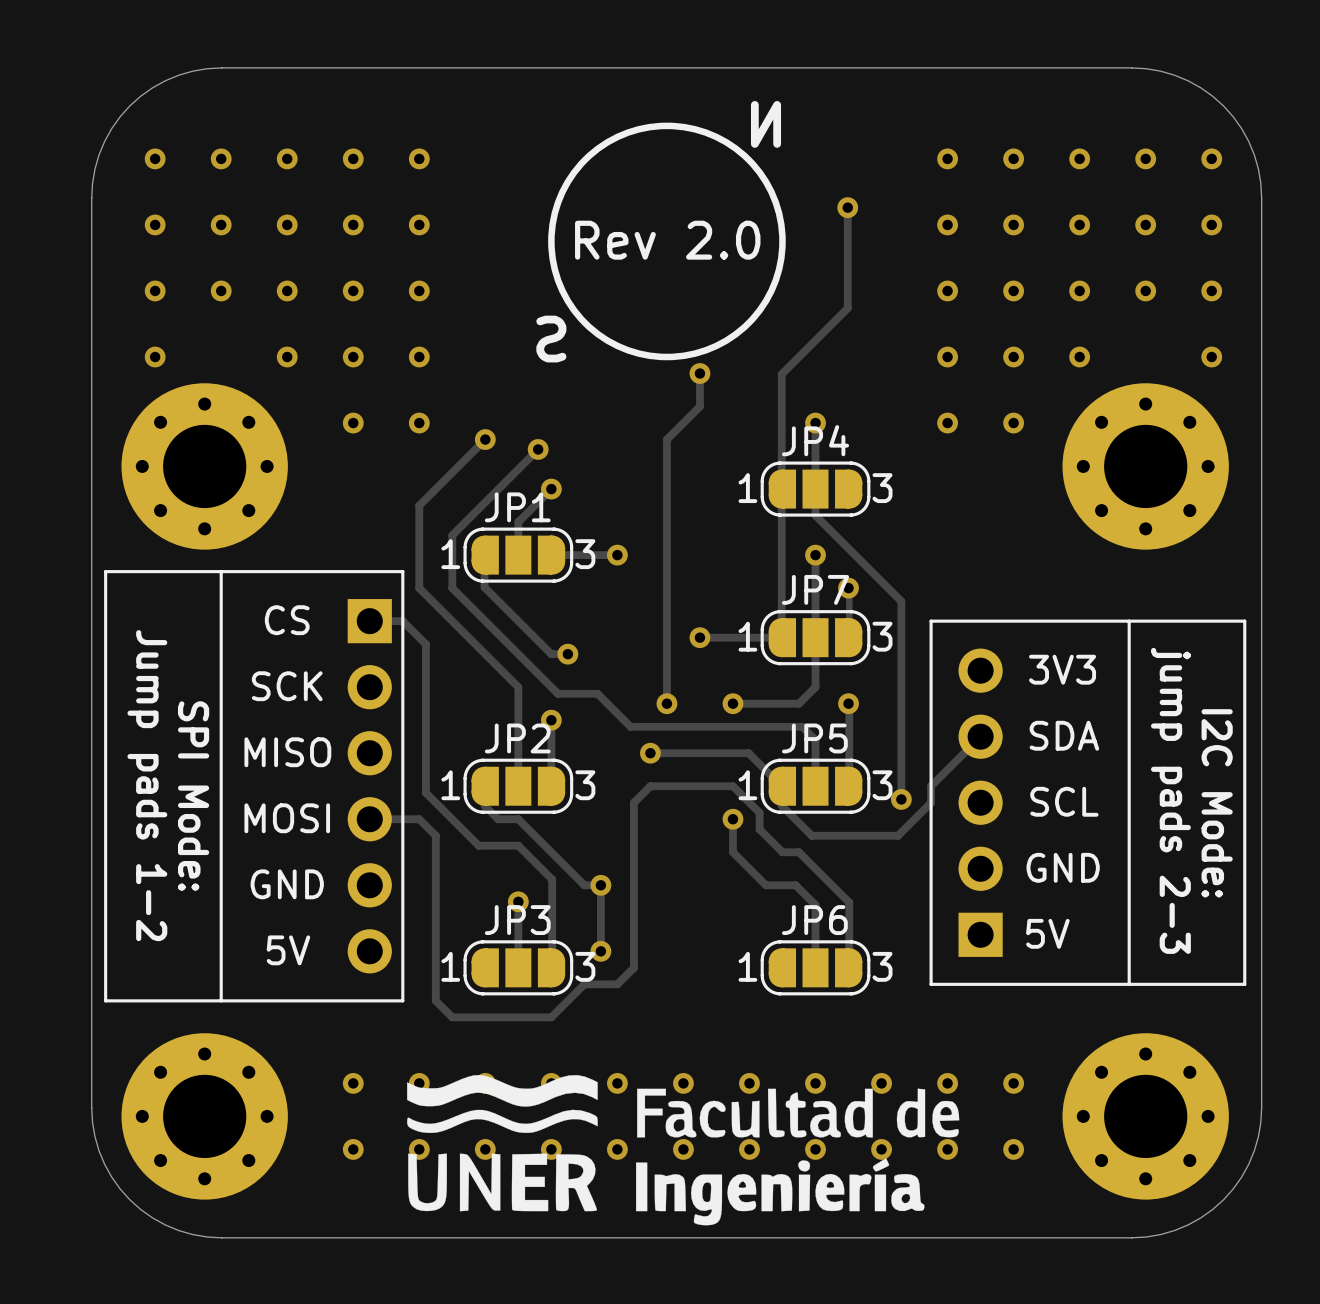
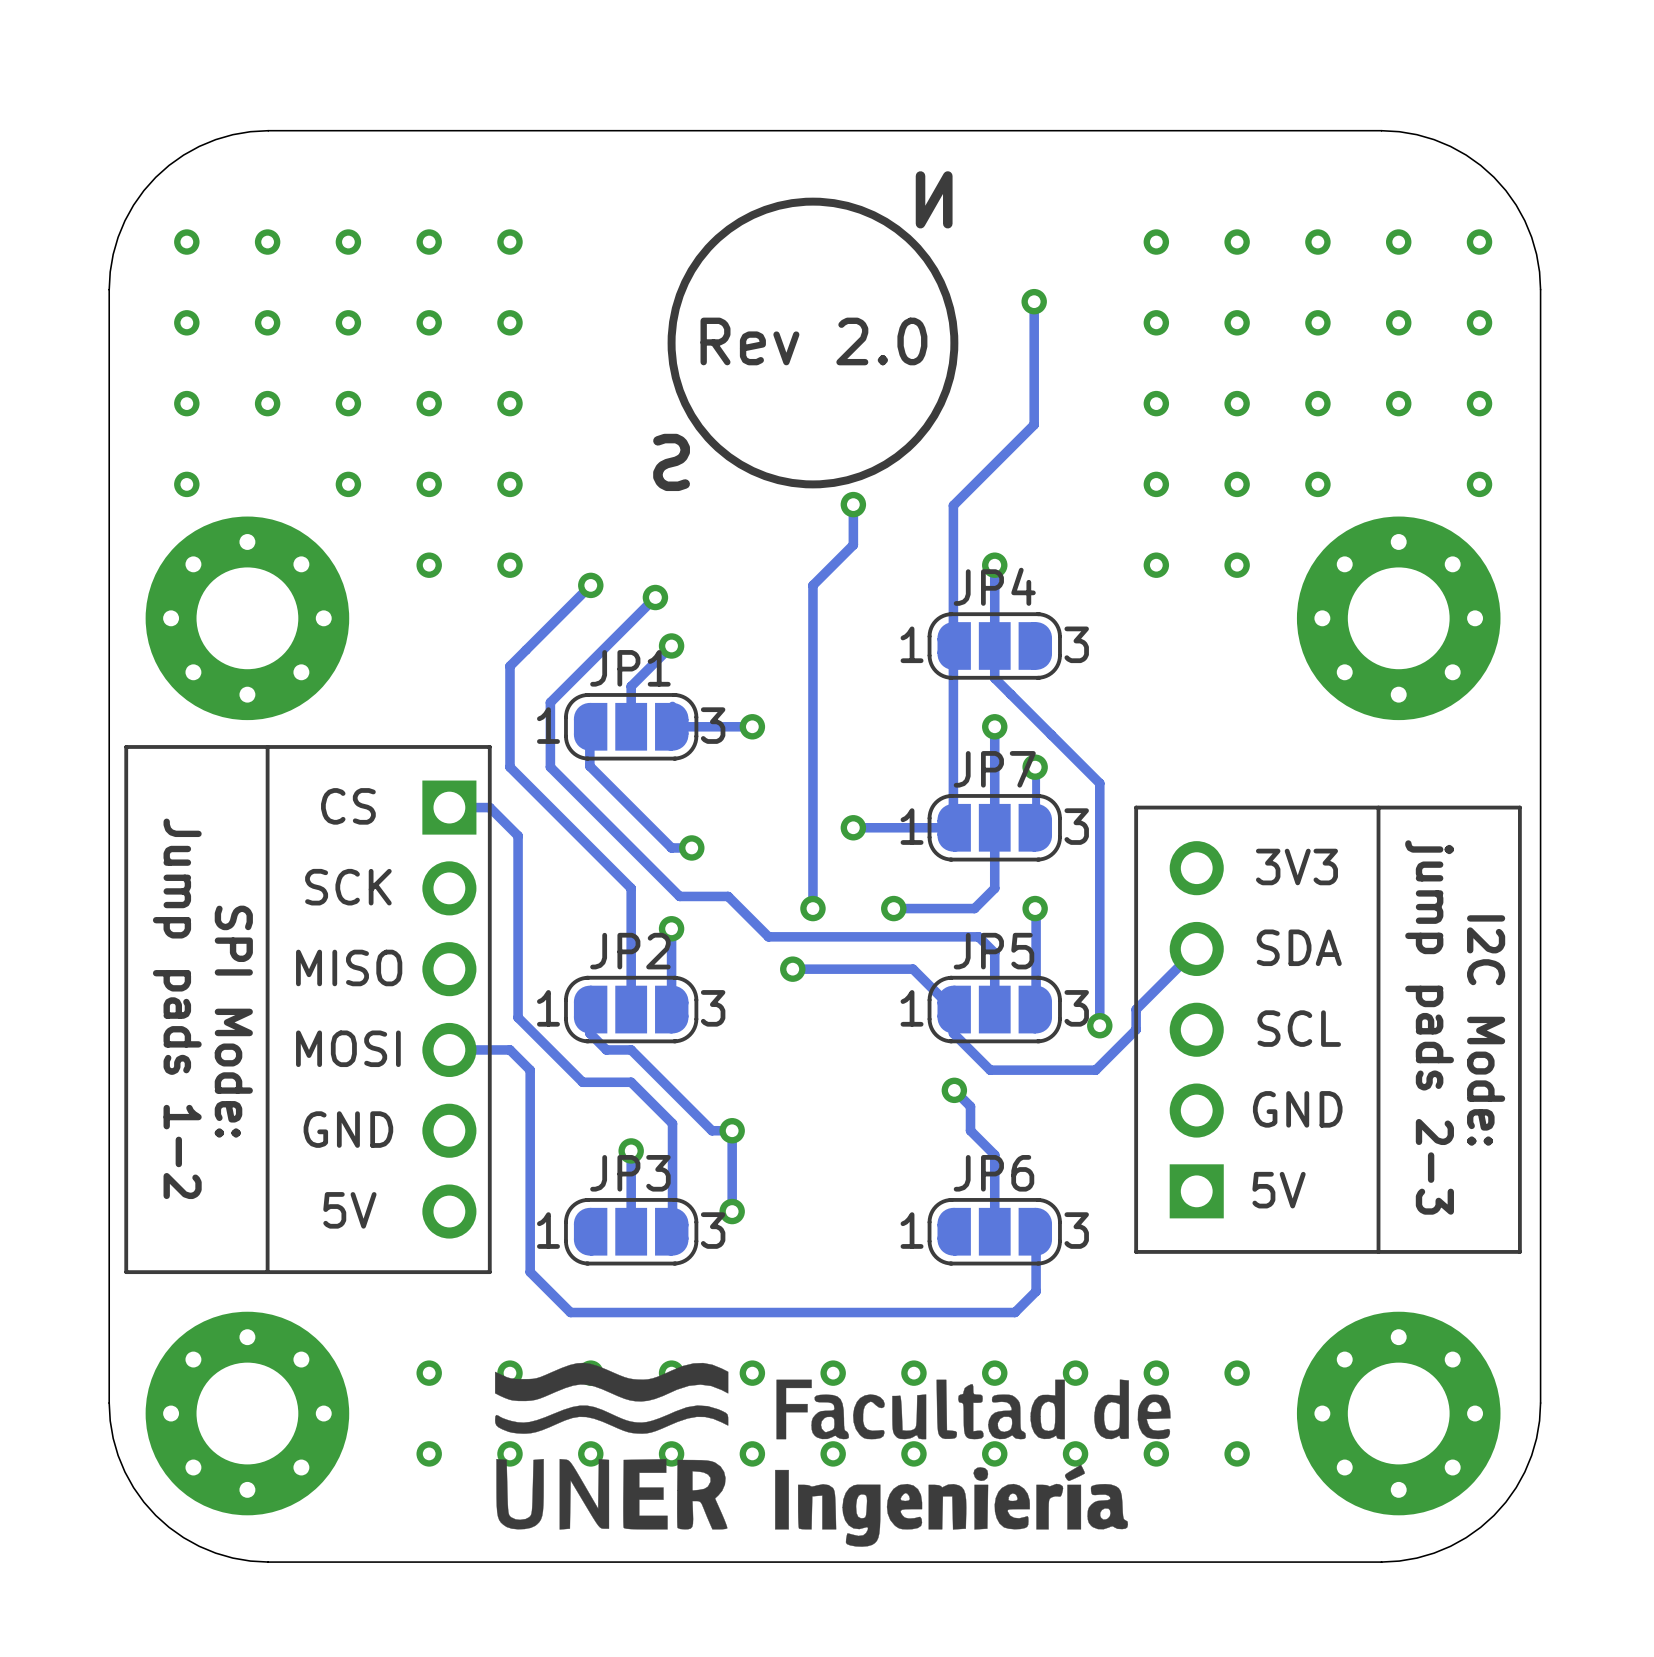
track: (732, 819) (732, 852) (765, 885) (795, 885) -> (954, 1090) (970, 1106) (970, 1130)
via position: (732, 819) -> (954, 1090)
track: (849, 967) (849, 902) (799, 852) (782, 852) (759, 829) (759, 812) (732, 786) (650, 786) (633, 802) (633, 967) (617, 984) (584, 984) (551, 1017) (452, 1017) -> (1036, 1231) (1036, 1291) (1014, 1312) (570, 1312) (550, 1292)

